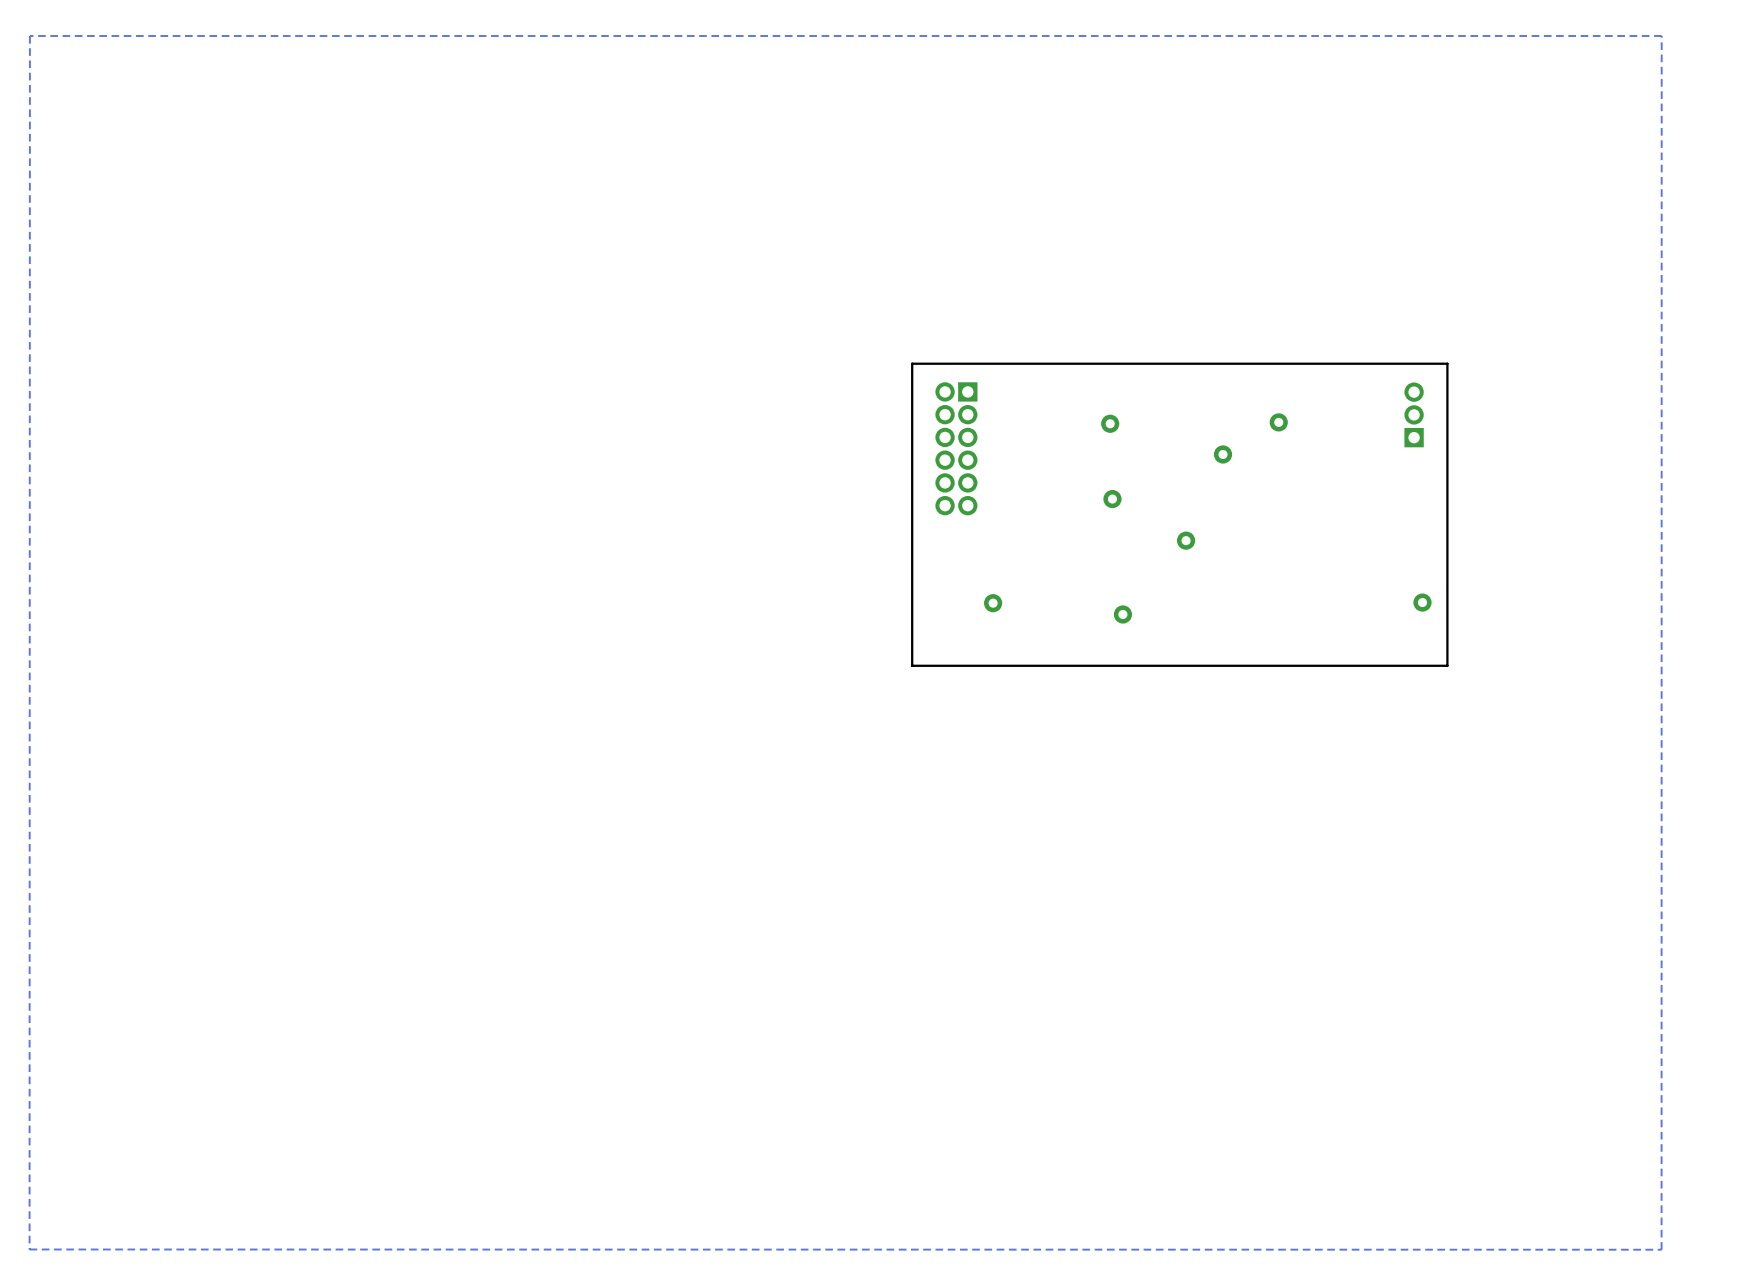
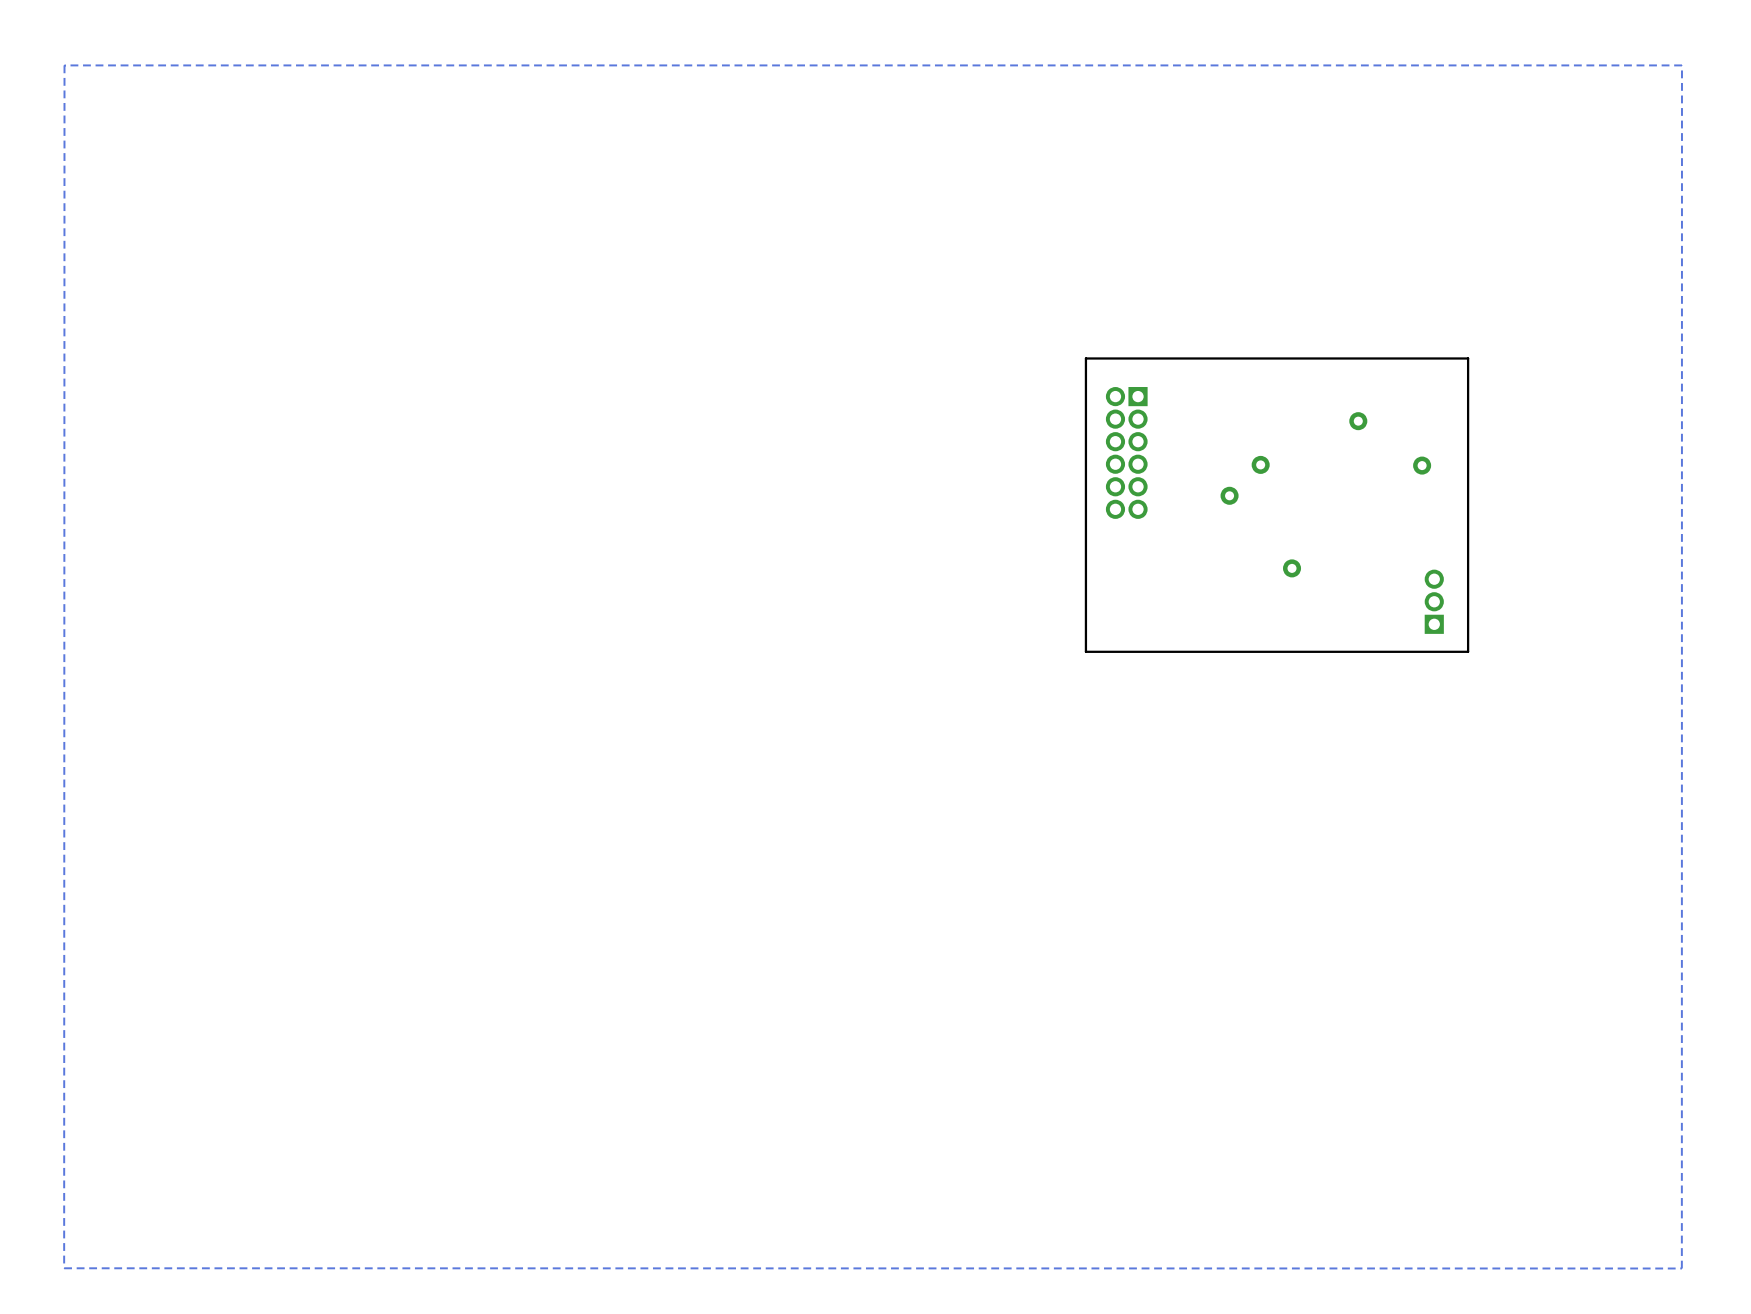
board edge: (1447, 363) (912, 363) (912, 665) (1447, 665) (1447, 363) -> (1468, 358) (1468, 651) (1085, 651) (1085, 358) (1468, 358)
via: none -> (1358, 421)
part position: (1414, 414) -> (1434, 601)
via: (1278, 422) -> none
via: (1110, 423) -> none
via: none -> (1260, 464)
via: none -> (1422, 465)
part position: (956, 448) -> (1126, 452)
via: (1223, 454) -> none
via: none -> (1229, 495)
via: (1112, 499) -> none
via: (1186, 540) -> none
via: none -> (1292, 568)
via: (1422, 602) -> none
via: (993, 603) -> none
via: (1122, 614) -> none

